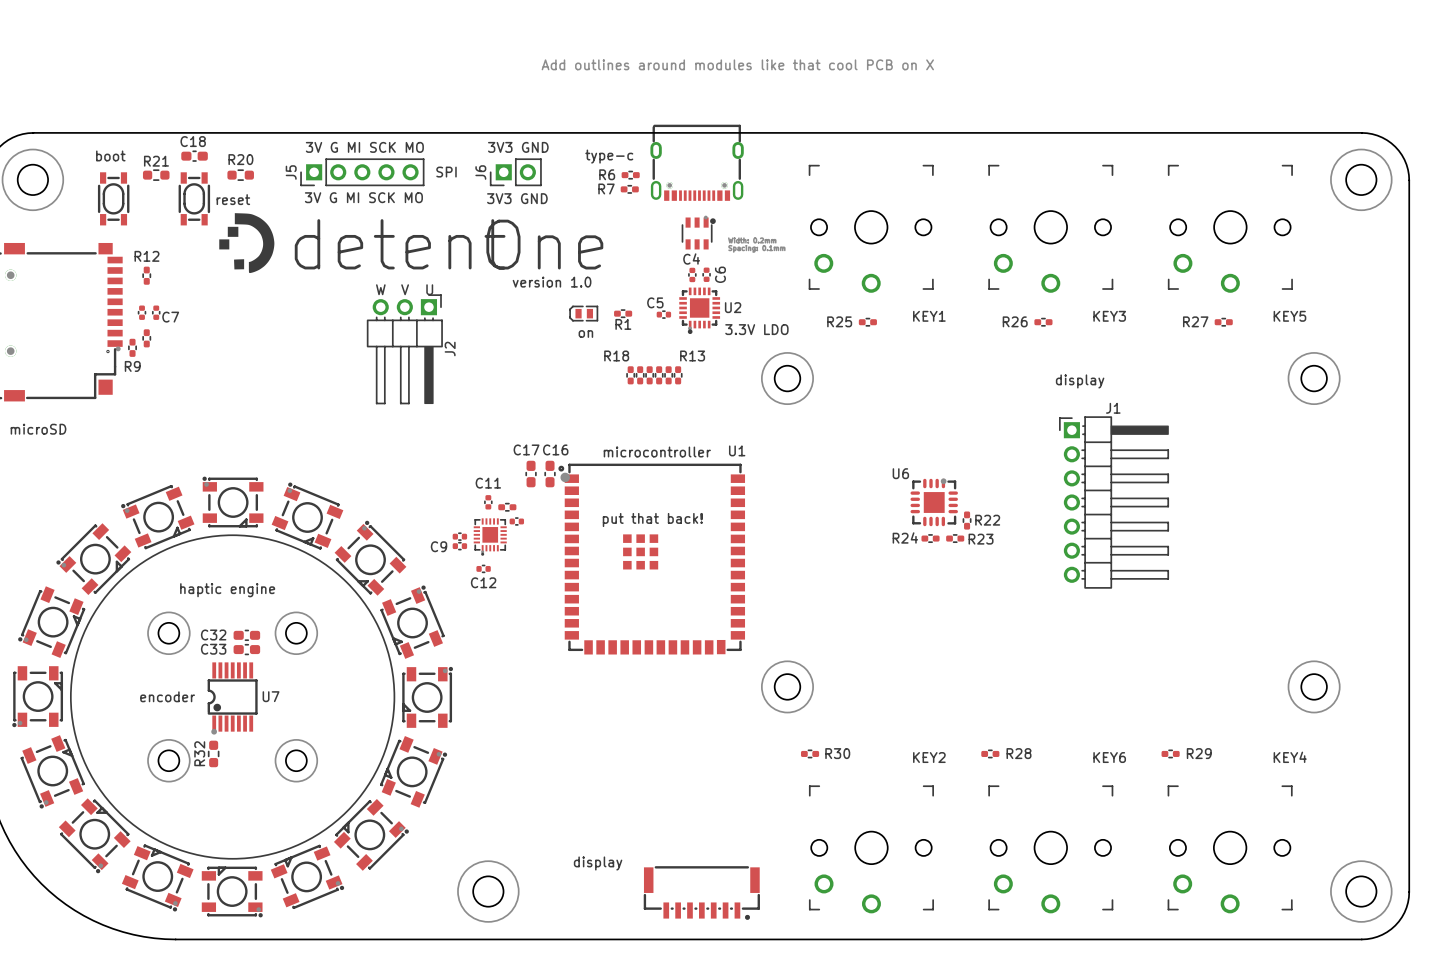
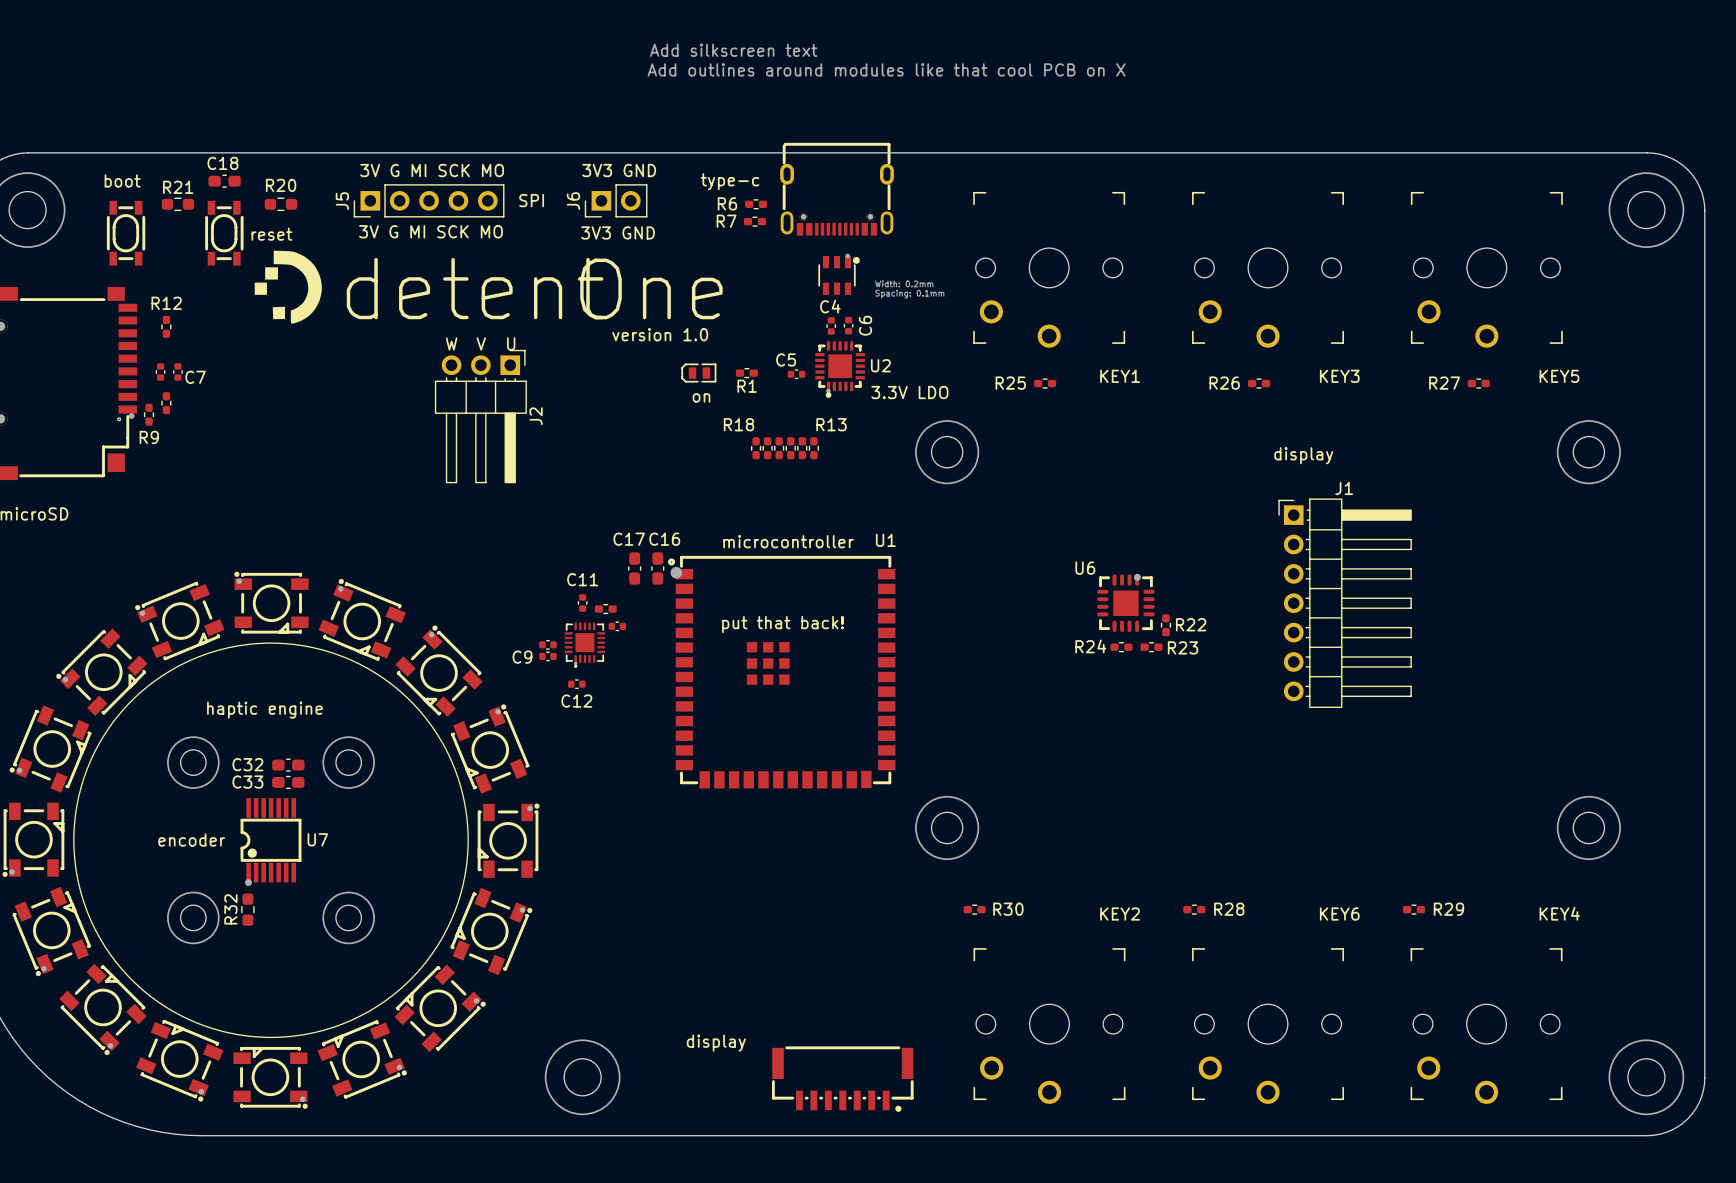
text: none -> Add silkscreen text (733, 50)

